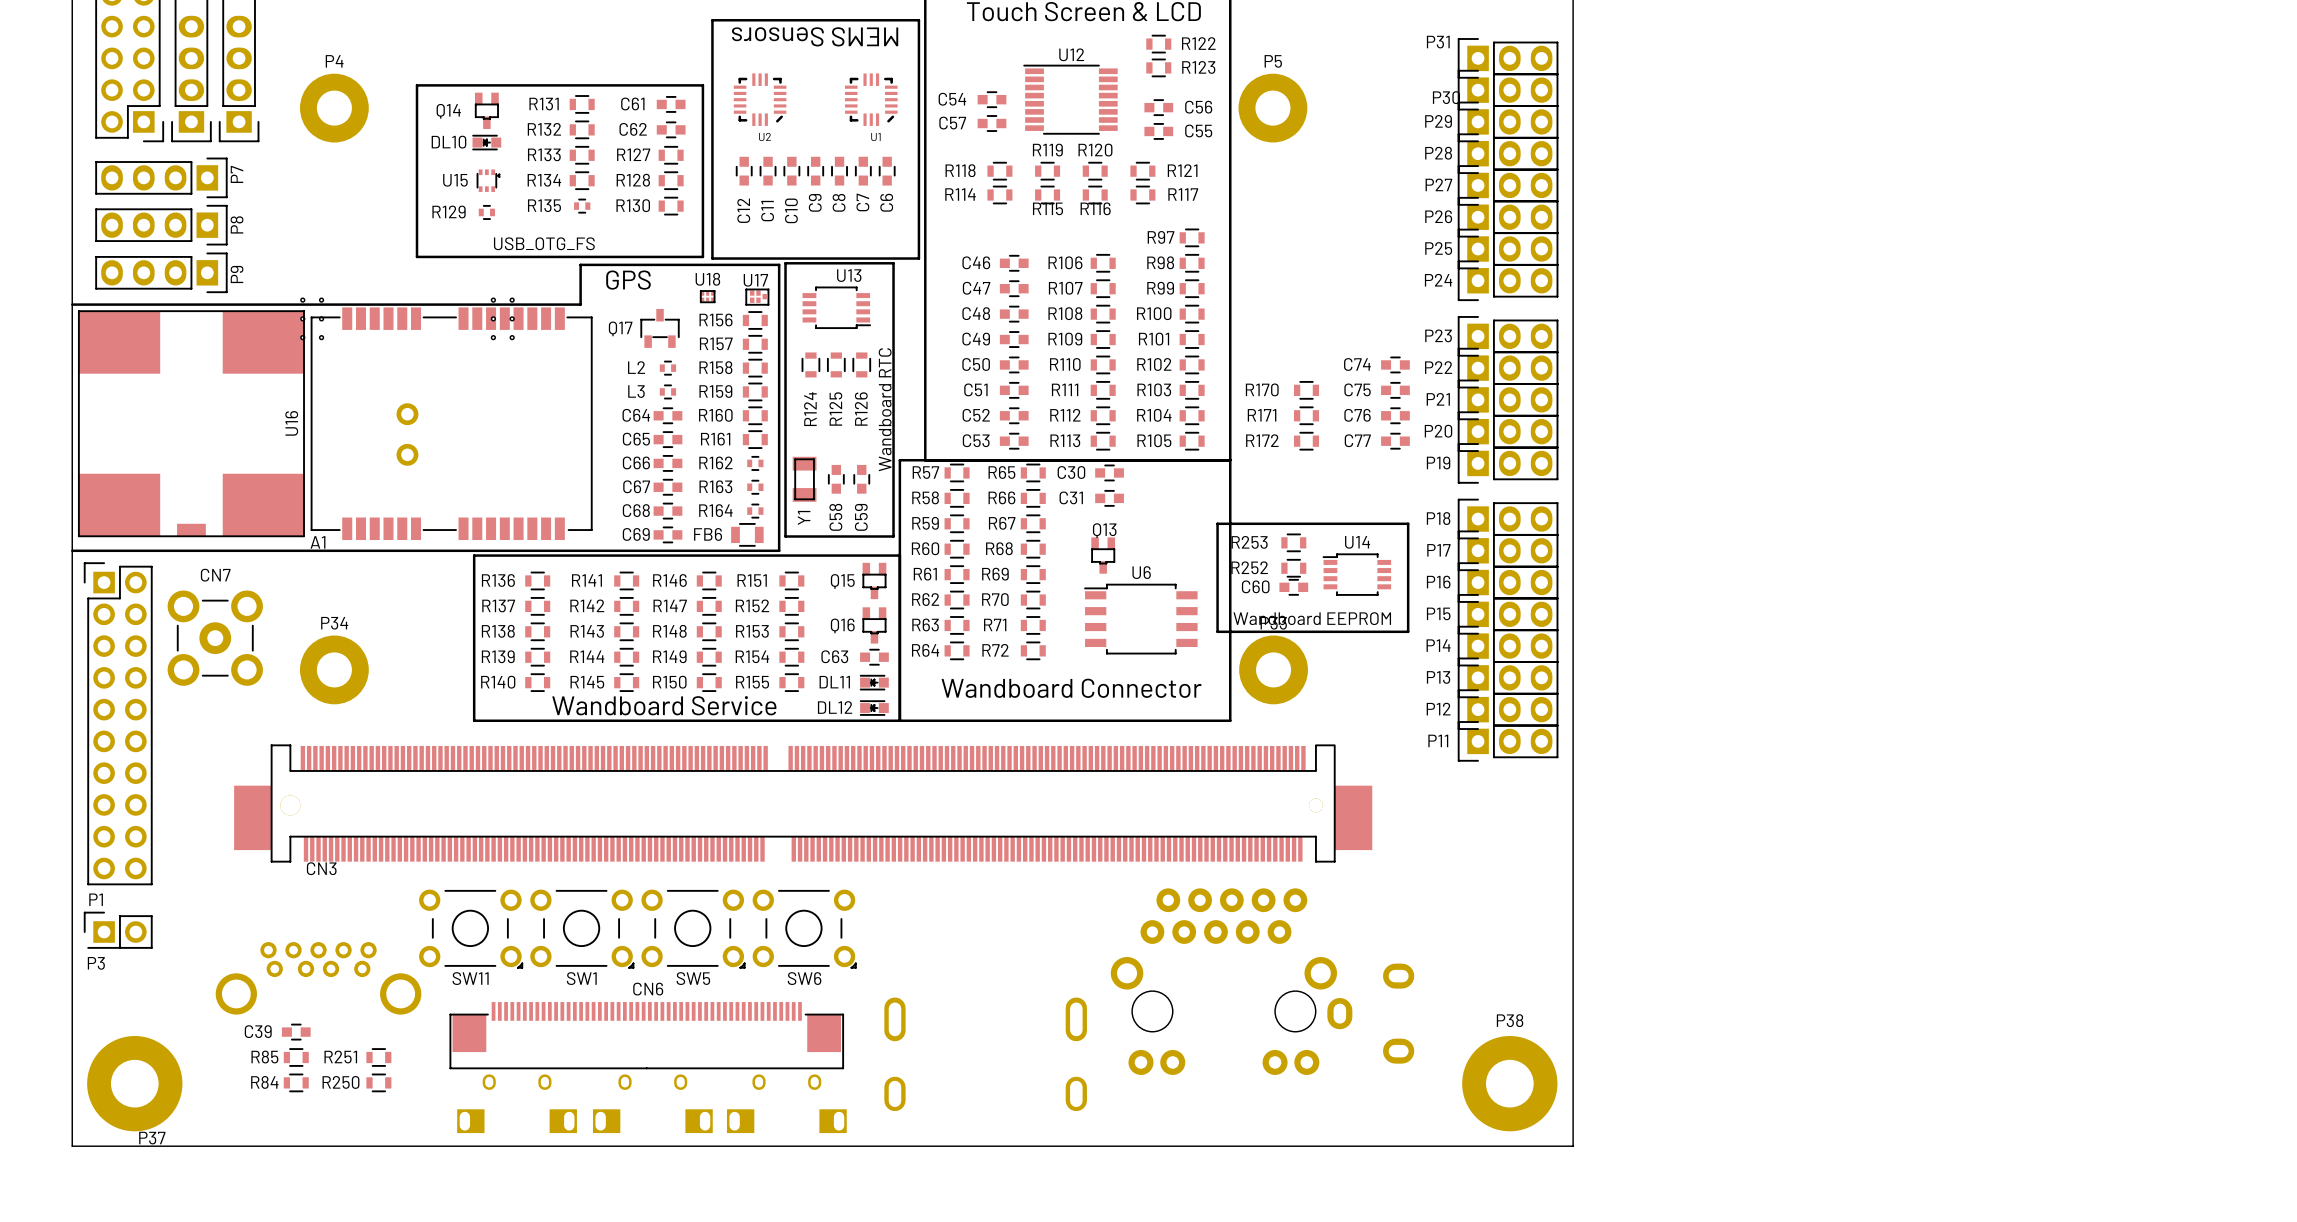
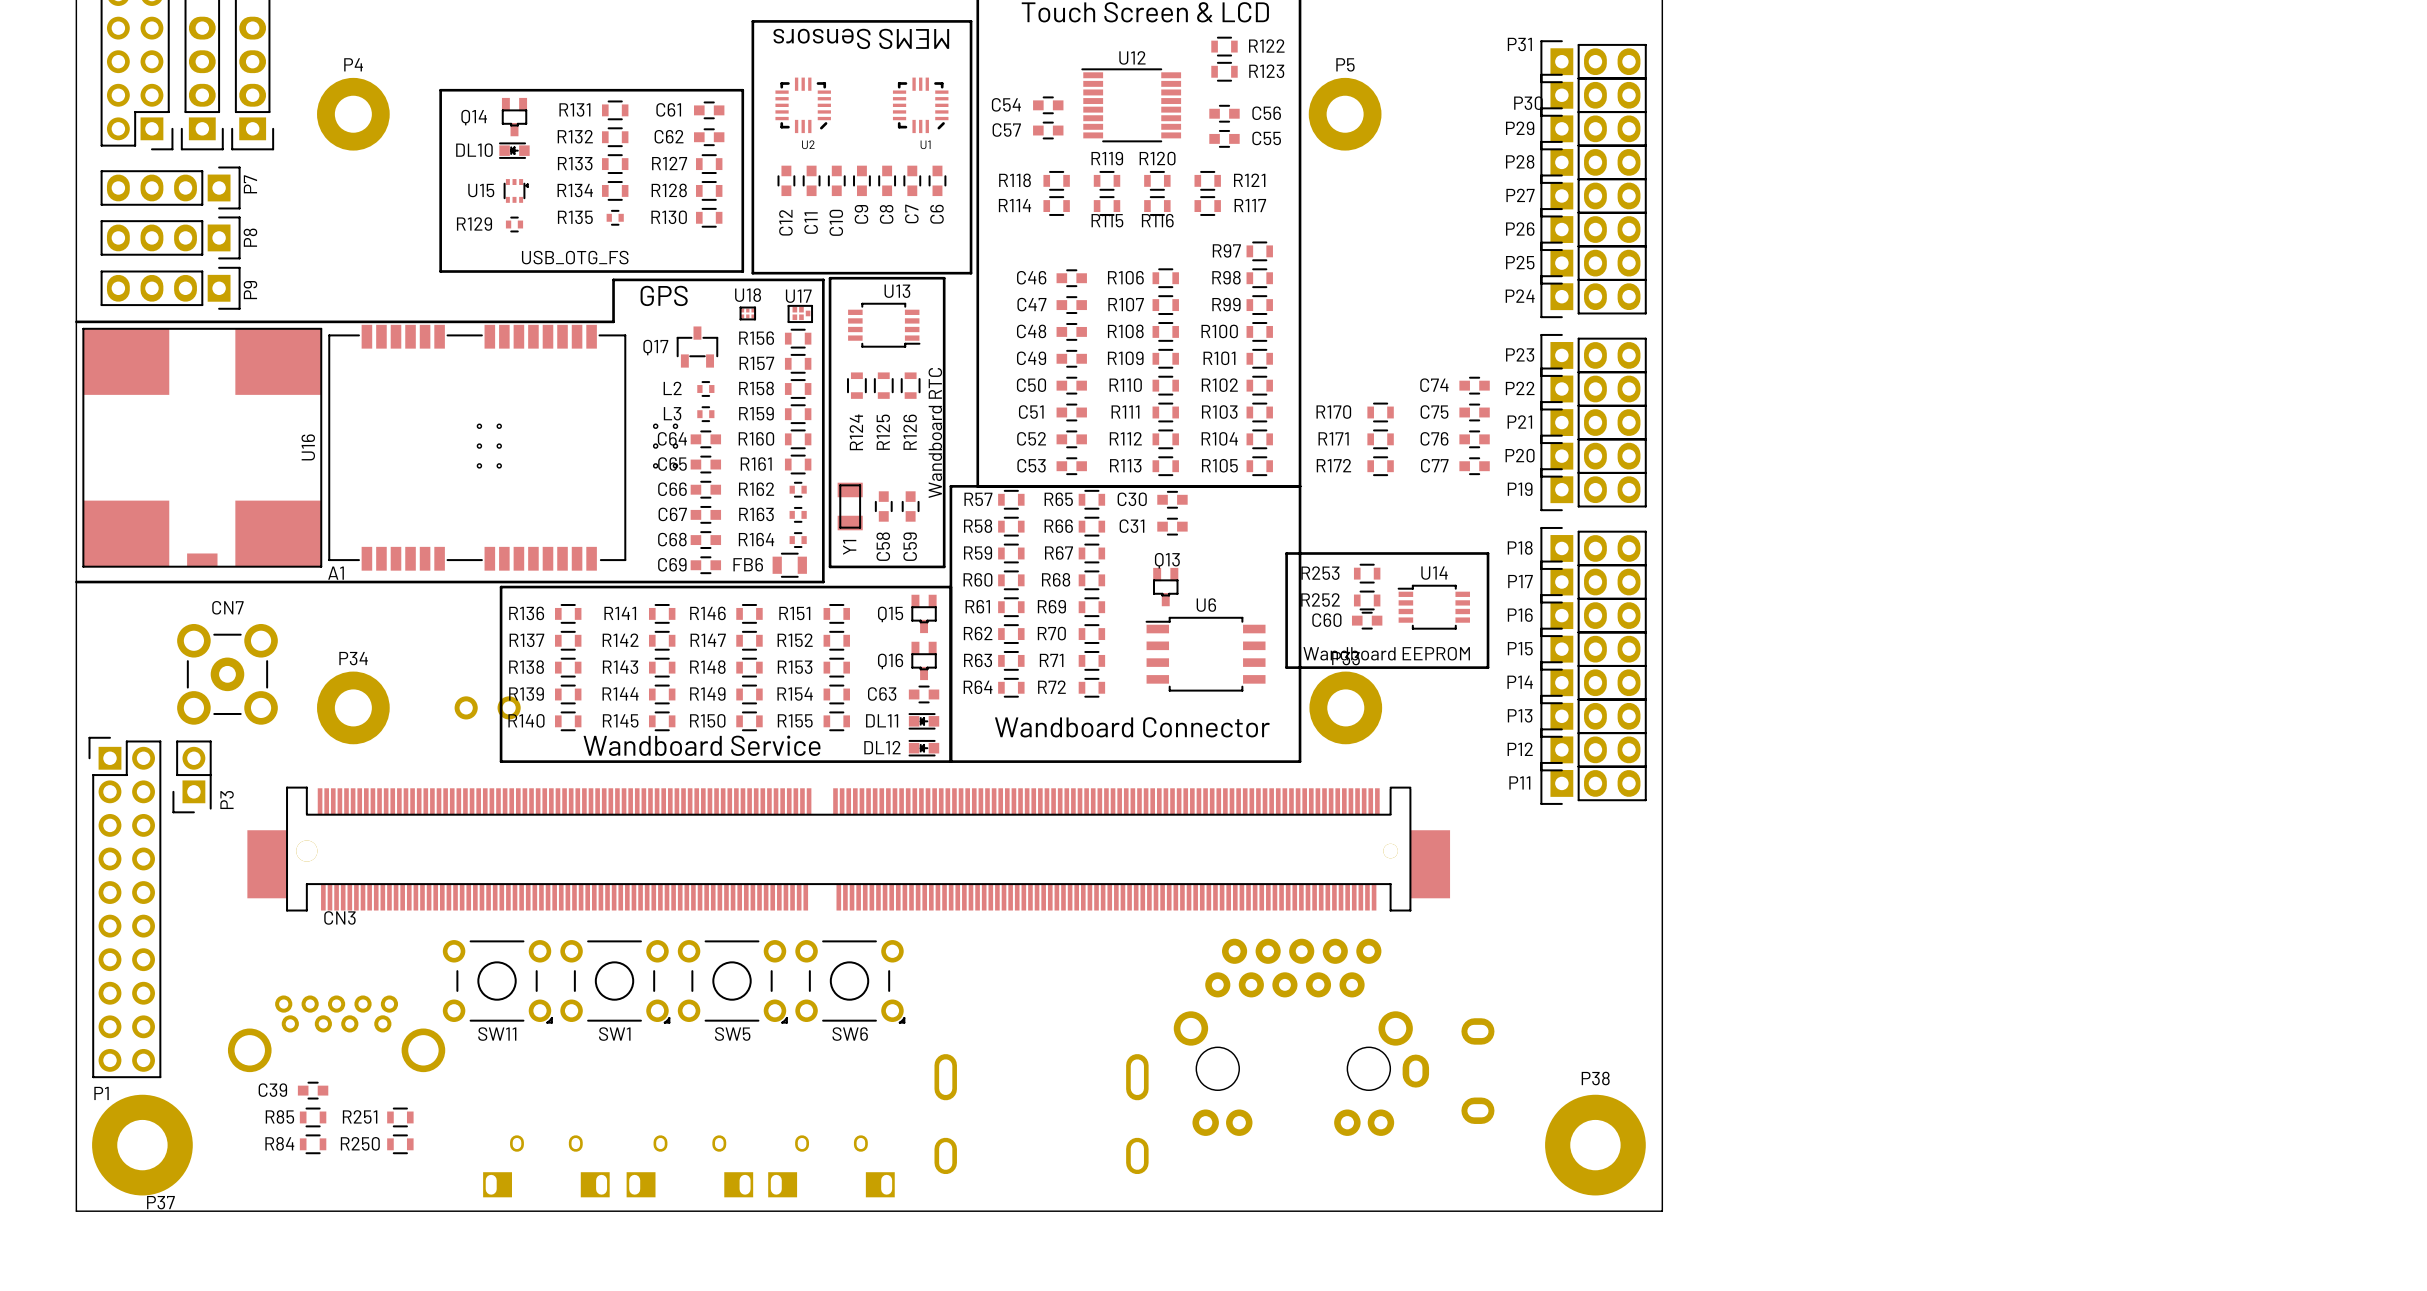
part: (312, 318) -> none
part: (502, 318) -> none
part: none -> (489, 446)
part: none -> (665, 446)
part rotation: 0° (407, 434) -> 90° clockwise (487, 707)
part position: (407, 434) -> (487, 707)
P1 position: (118, 723) -> (124, 907)
P3 rotation: 0° (118, 930) -> 90° counterclockwise (192, 776)
P3 position: (118, 930) -> (192, 776)
CN6: (646, 1035) -> none

